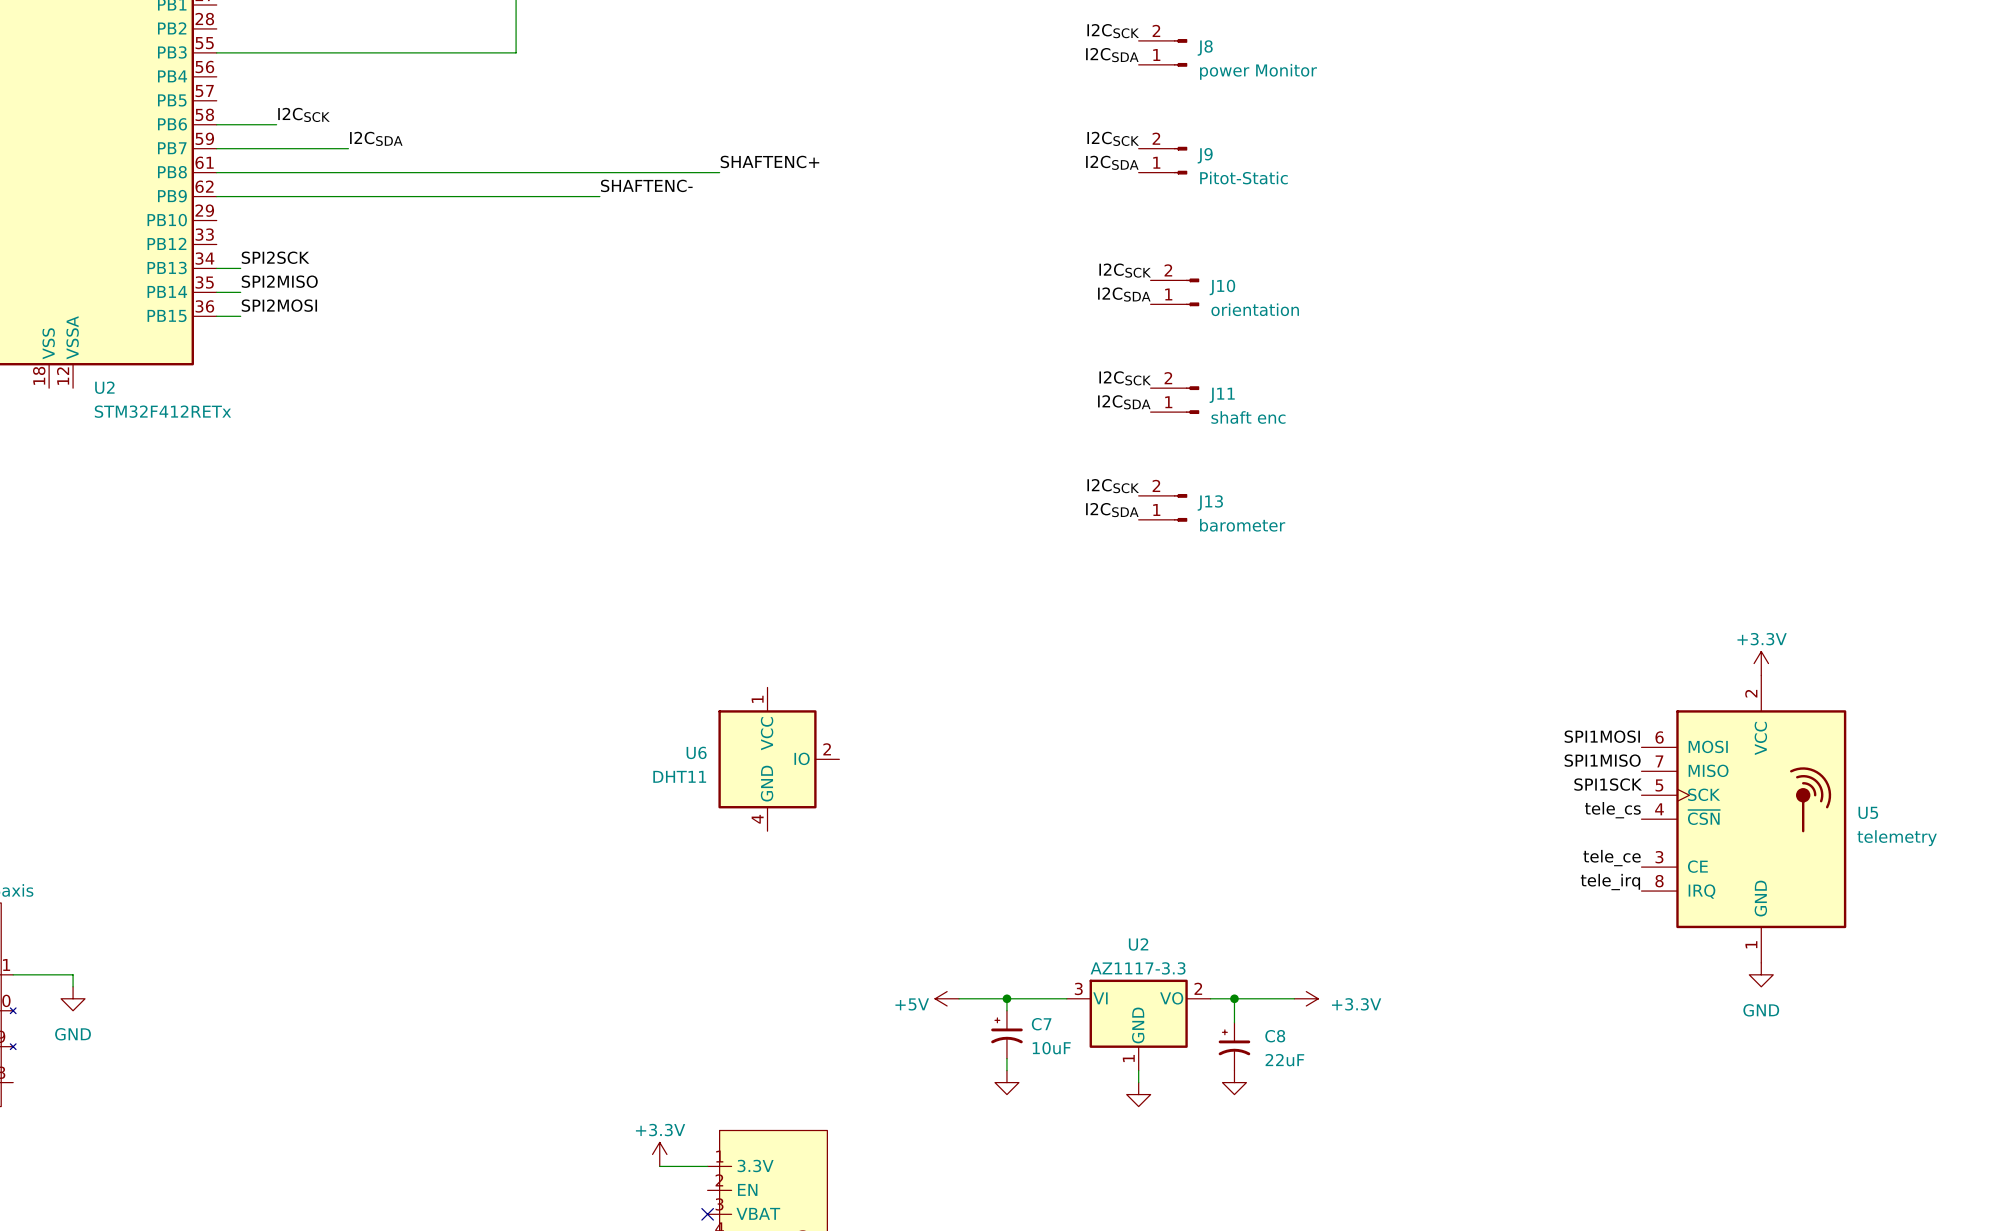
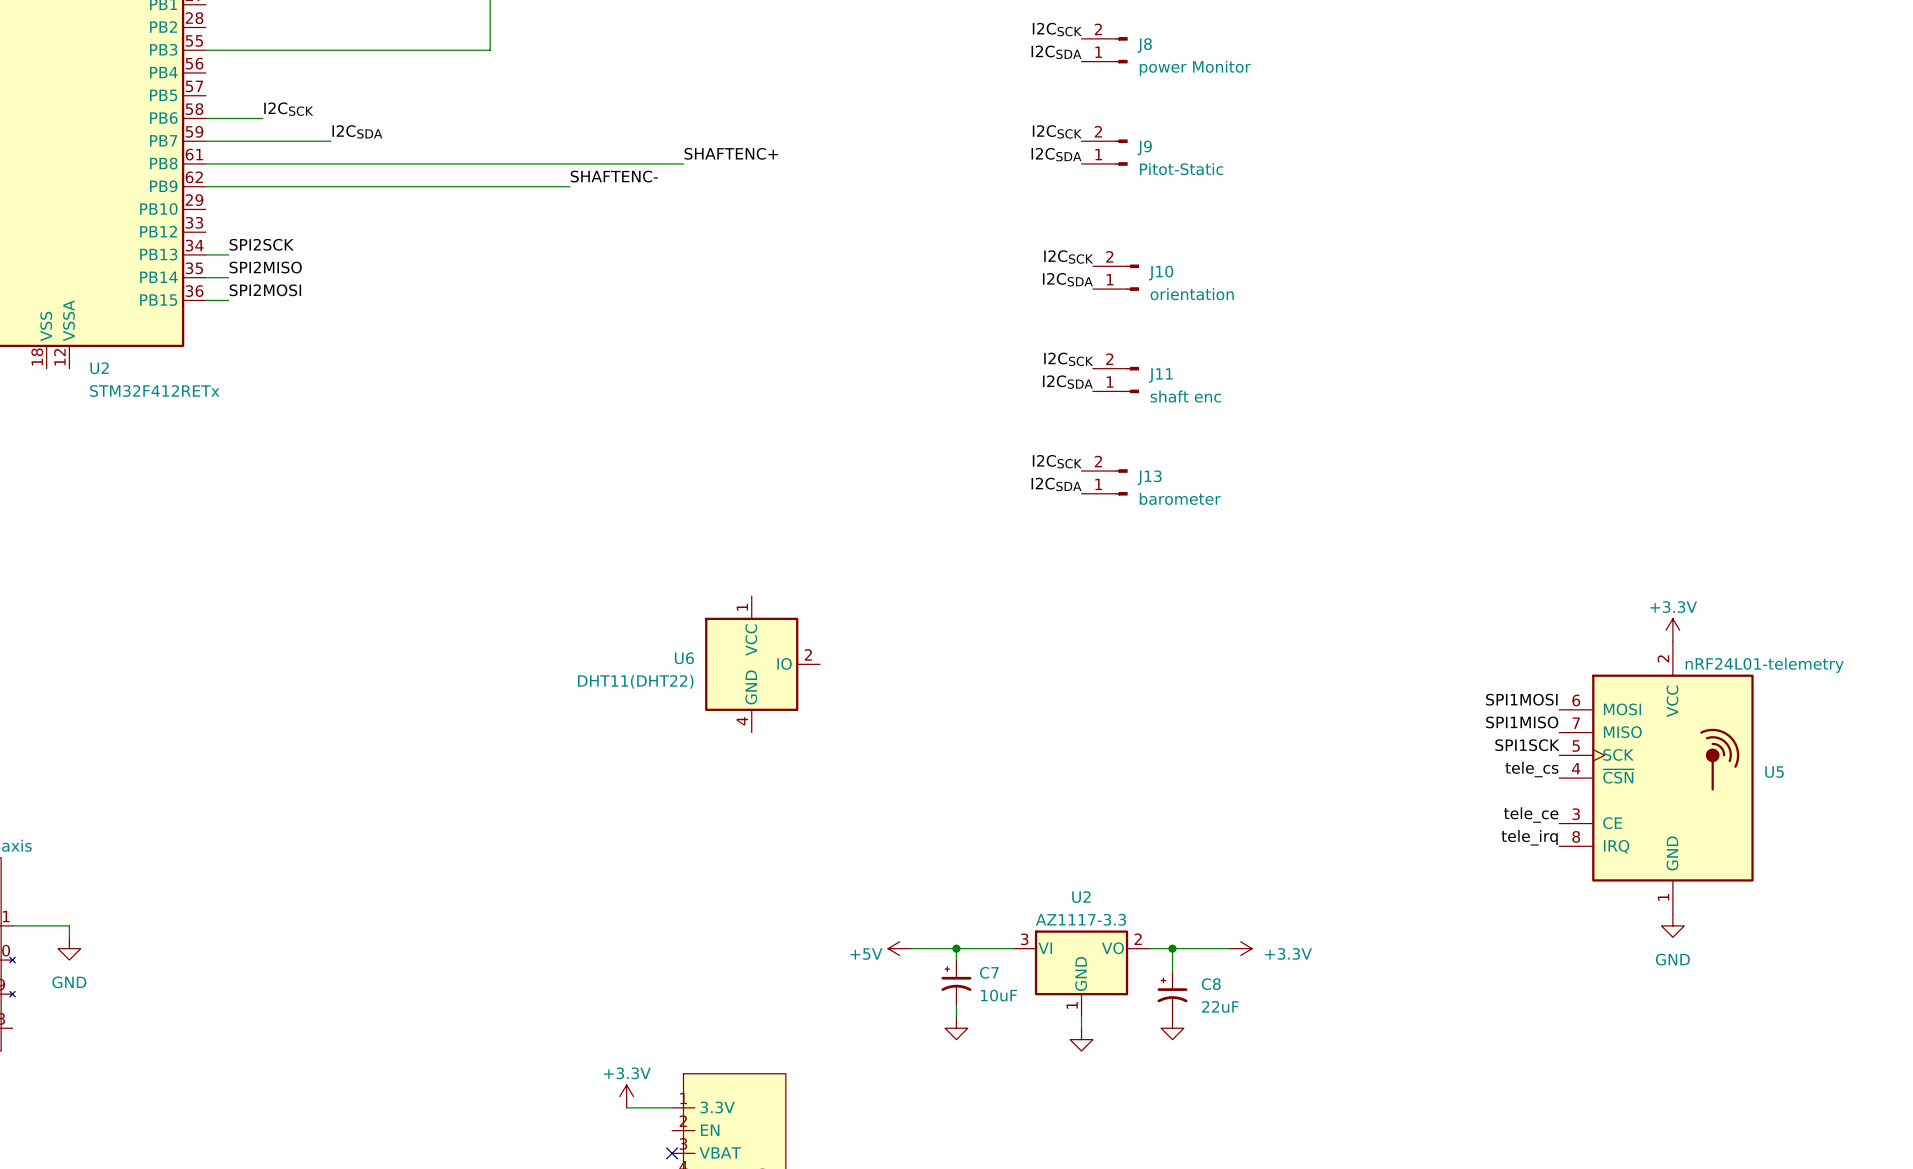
U6 position: (778, 759) -> (762, 664)
U6 value: DHT11 (679, 776) -> DHT11(DHT22) (635, 681)
U5 value: telemetry (1897, 838) -> nRF24L01-telemetry (1764, 665)

